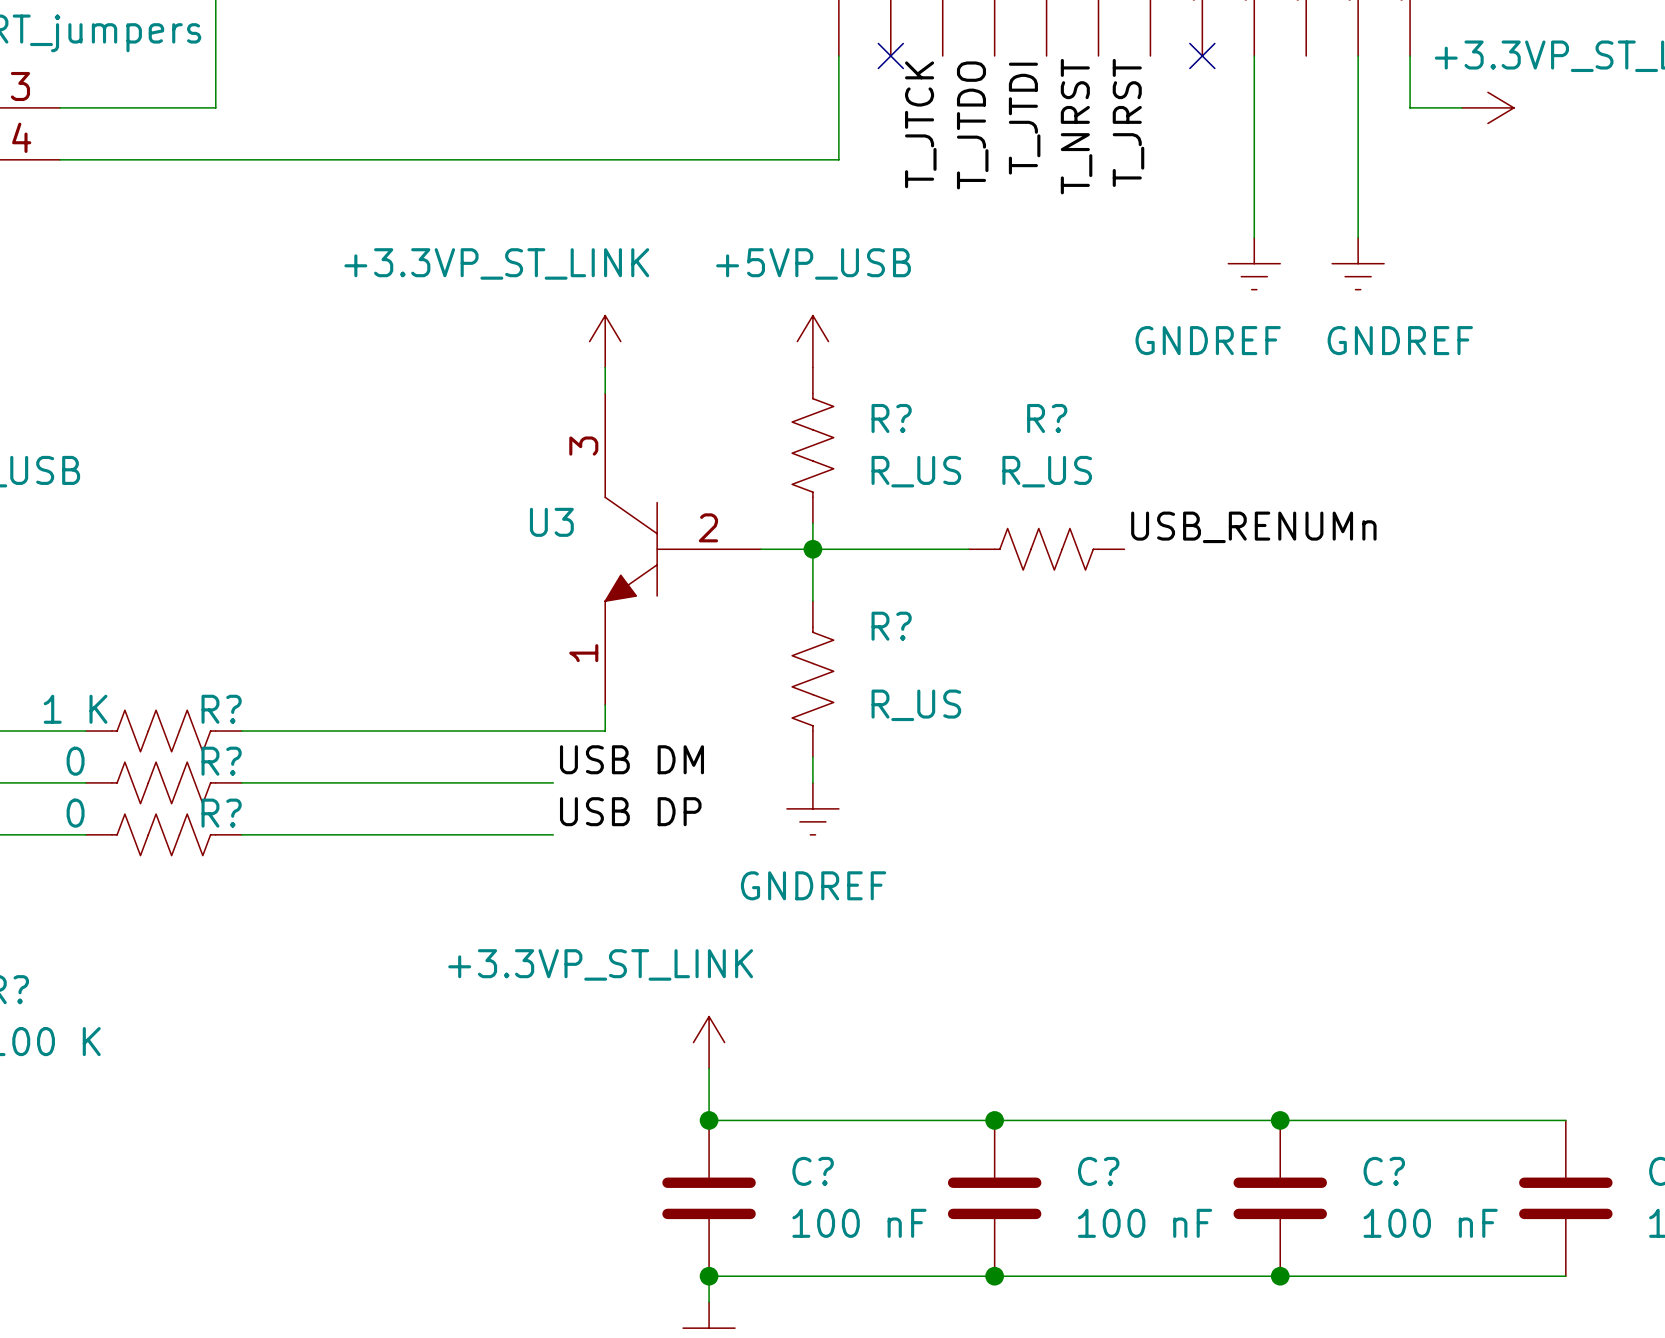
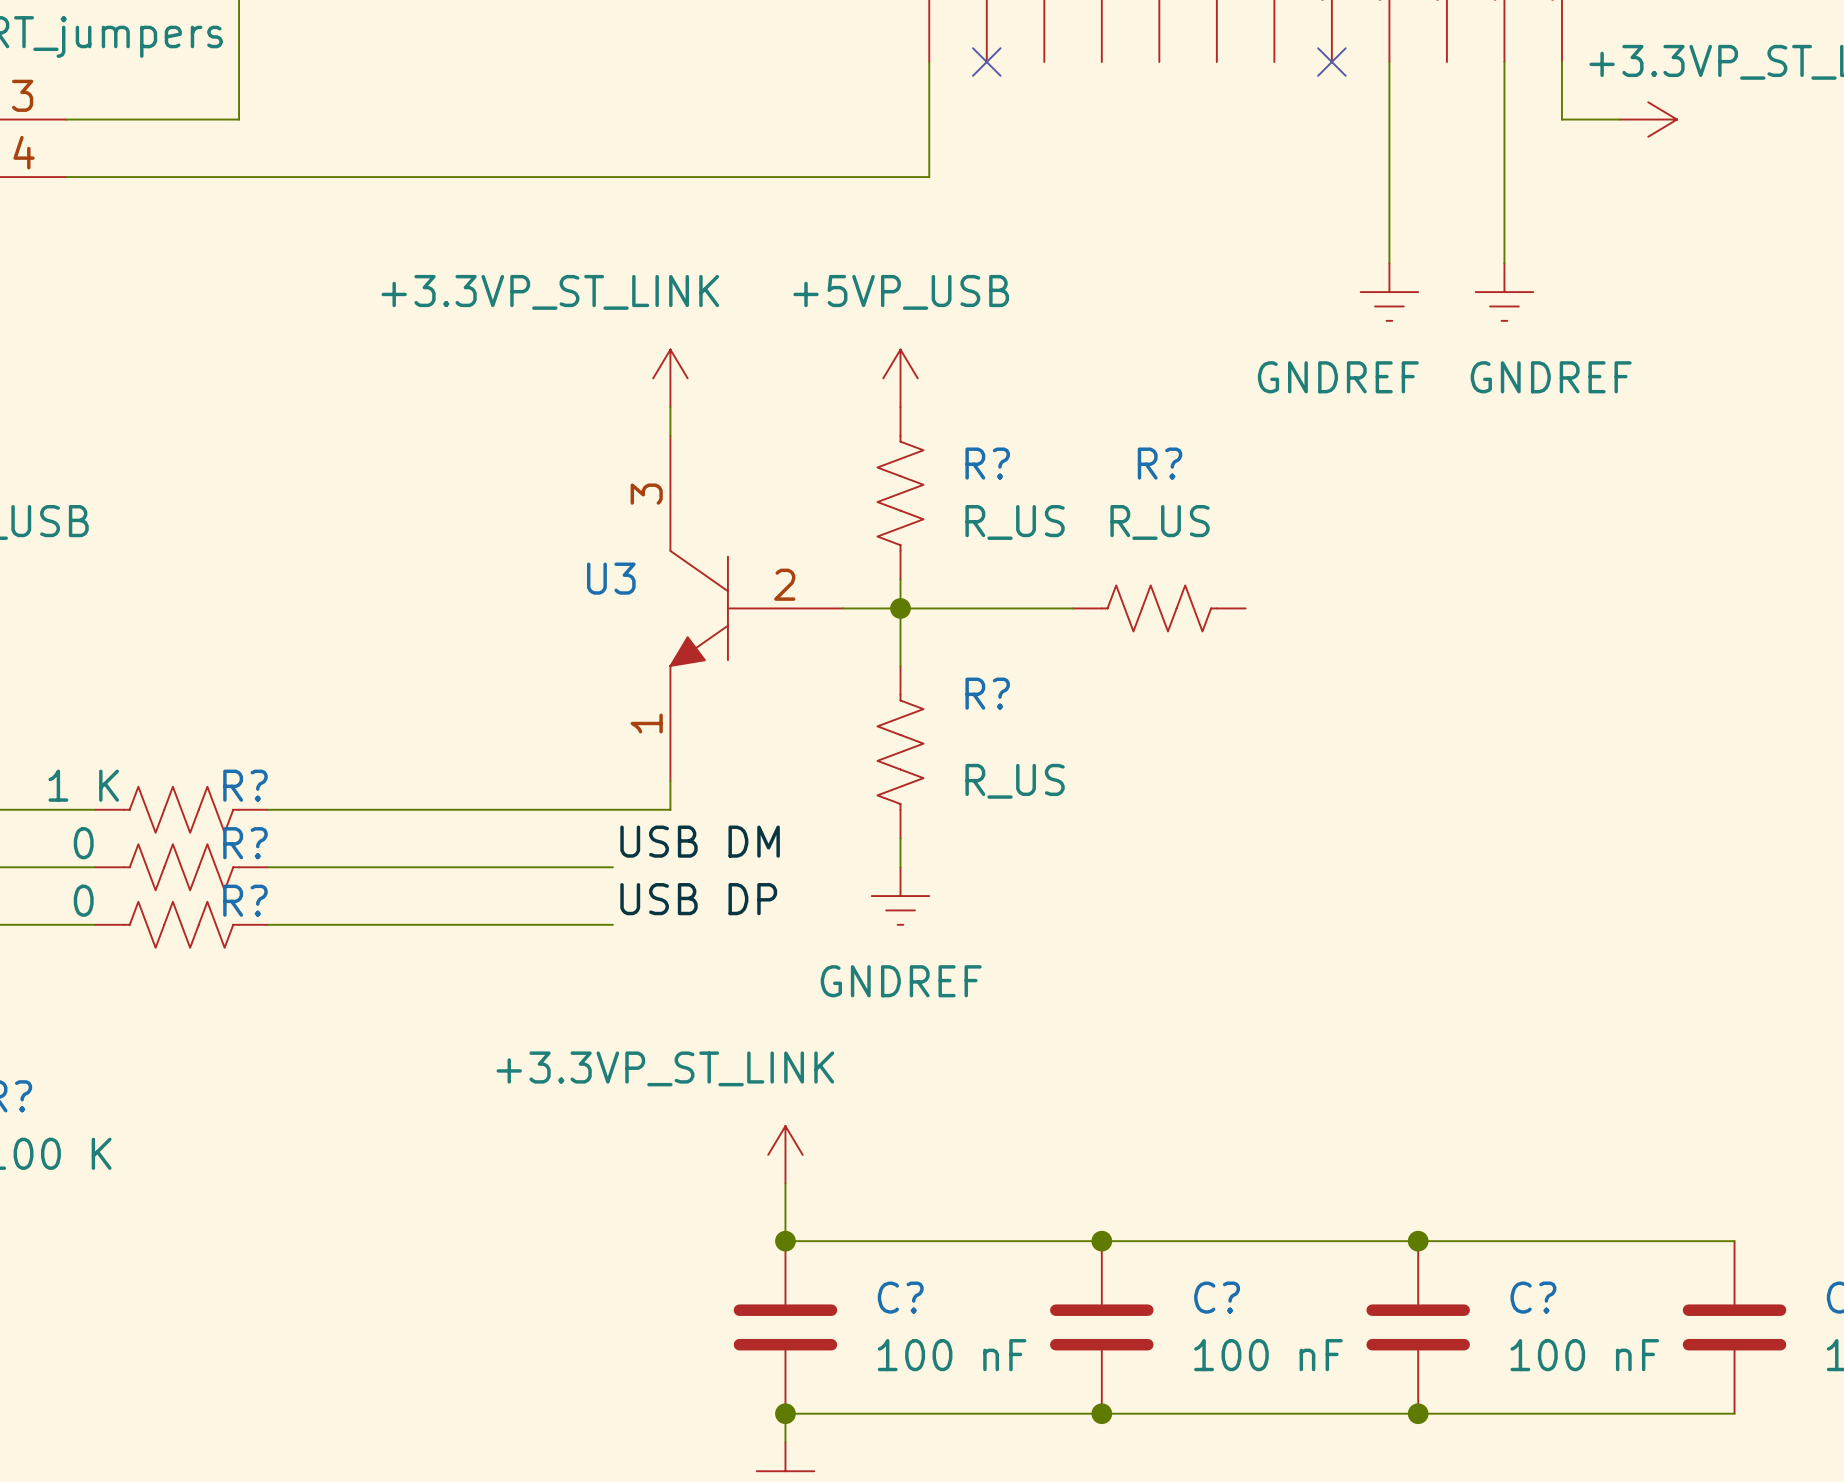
label: T_JTDI (1024, 118) -> none
label: T_JRST (1128, 122) -> none
label: T_JTCK (920, 124) -> none
label: T_JTDO (972, 125) -> none
label: T_NRST (1076, 126) -> none
label: USB_RENUMn (1253, 527) -> none

